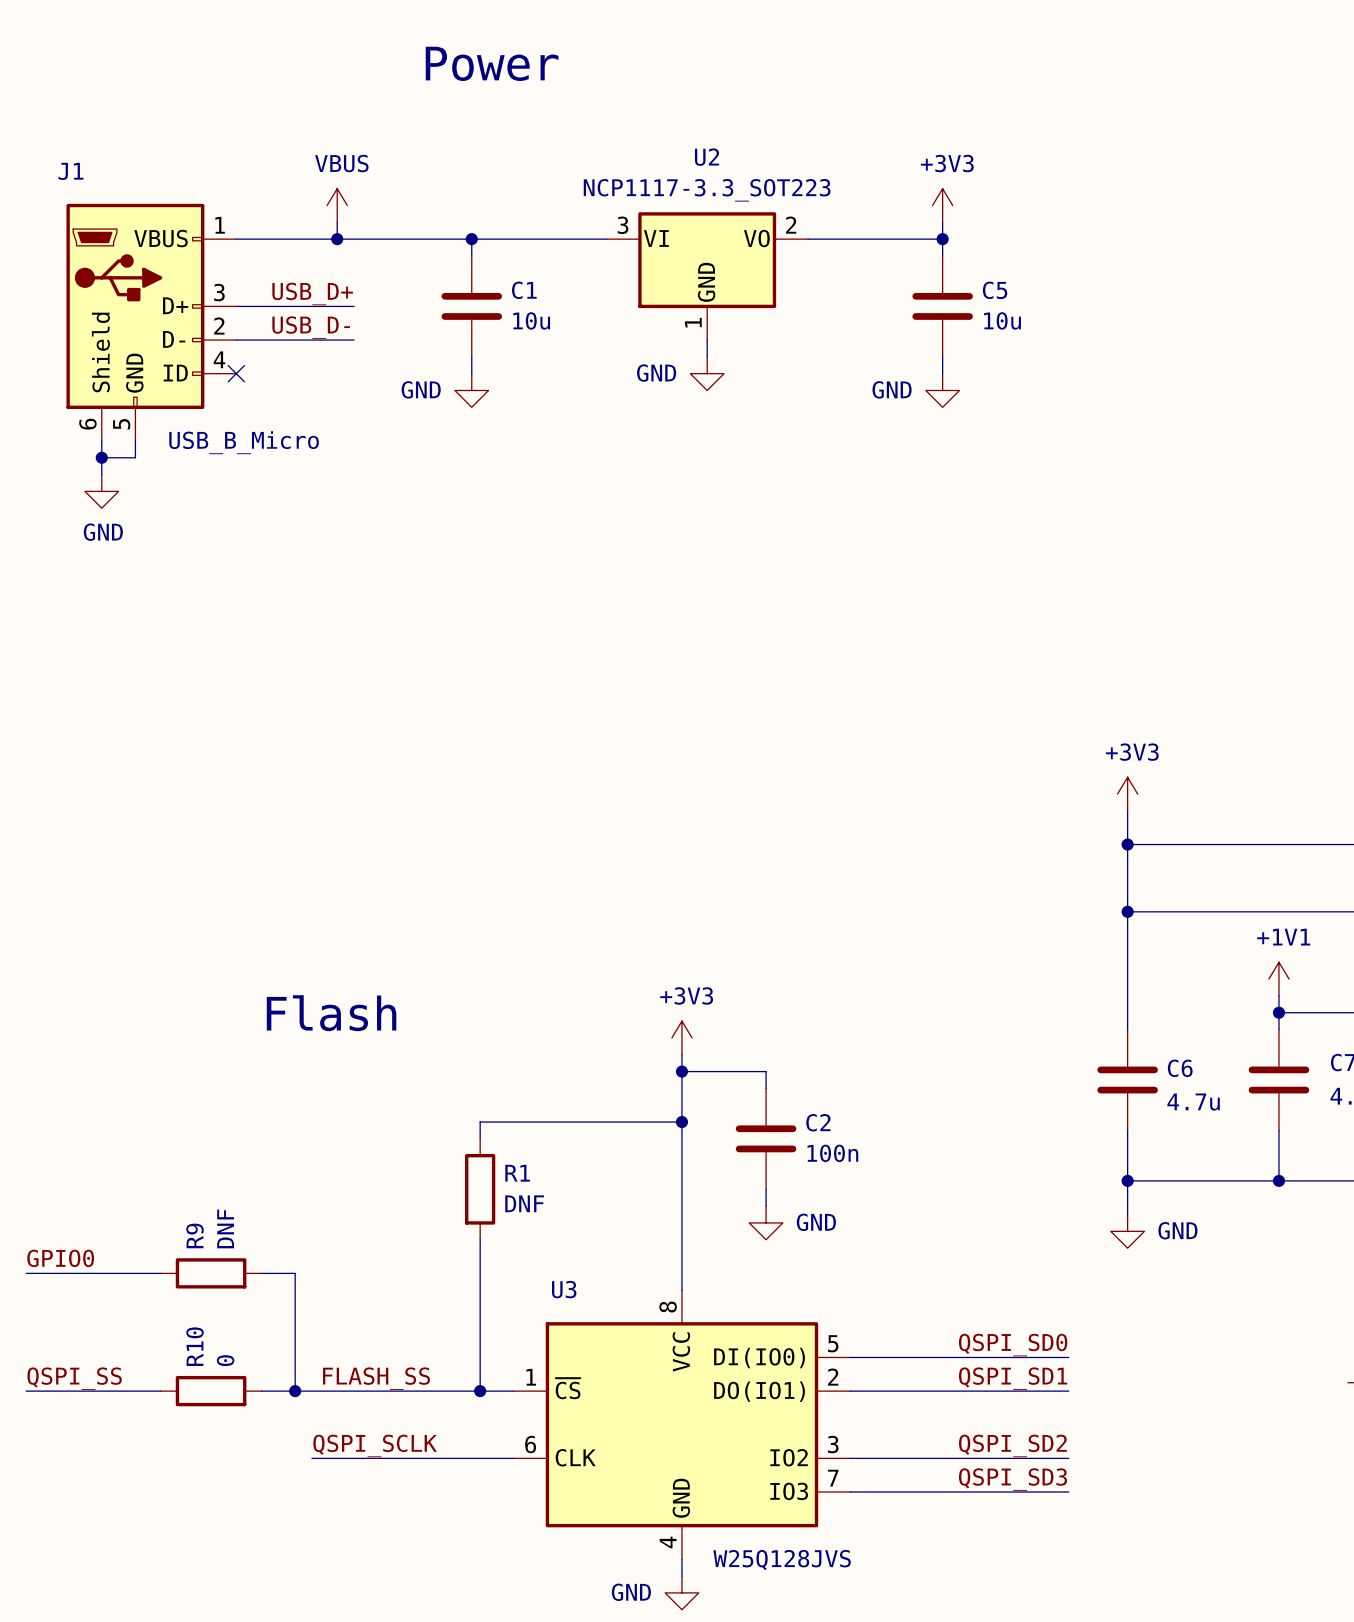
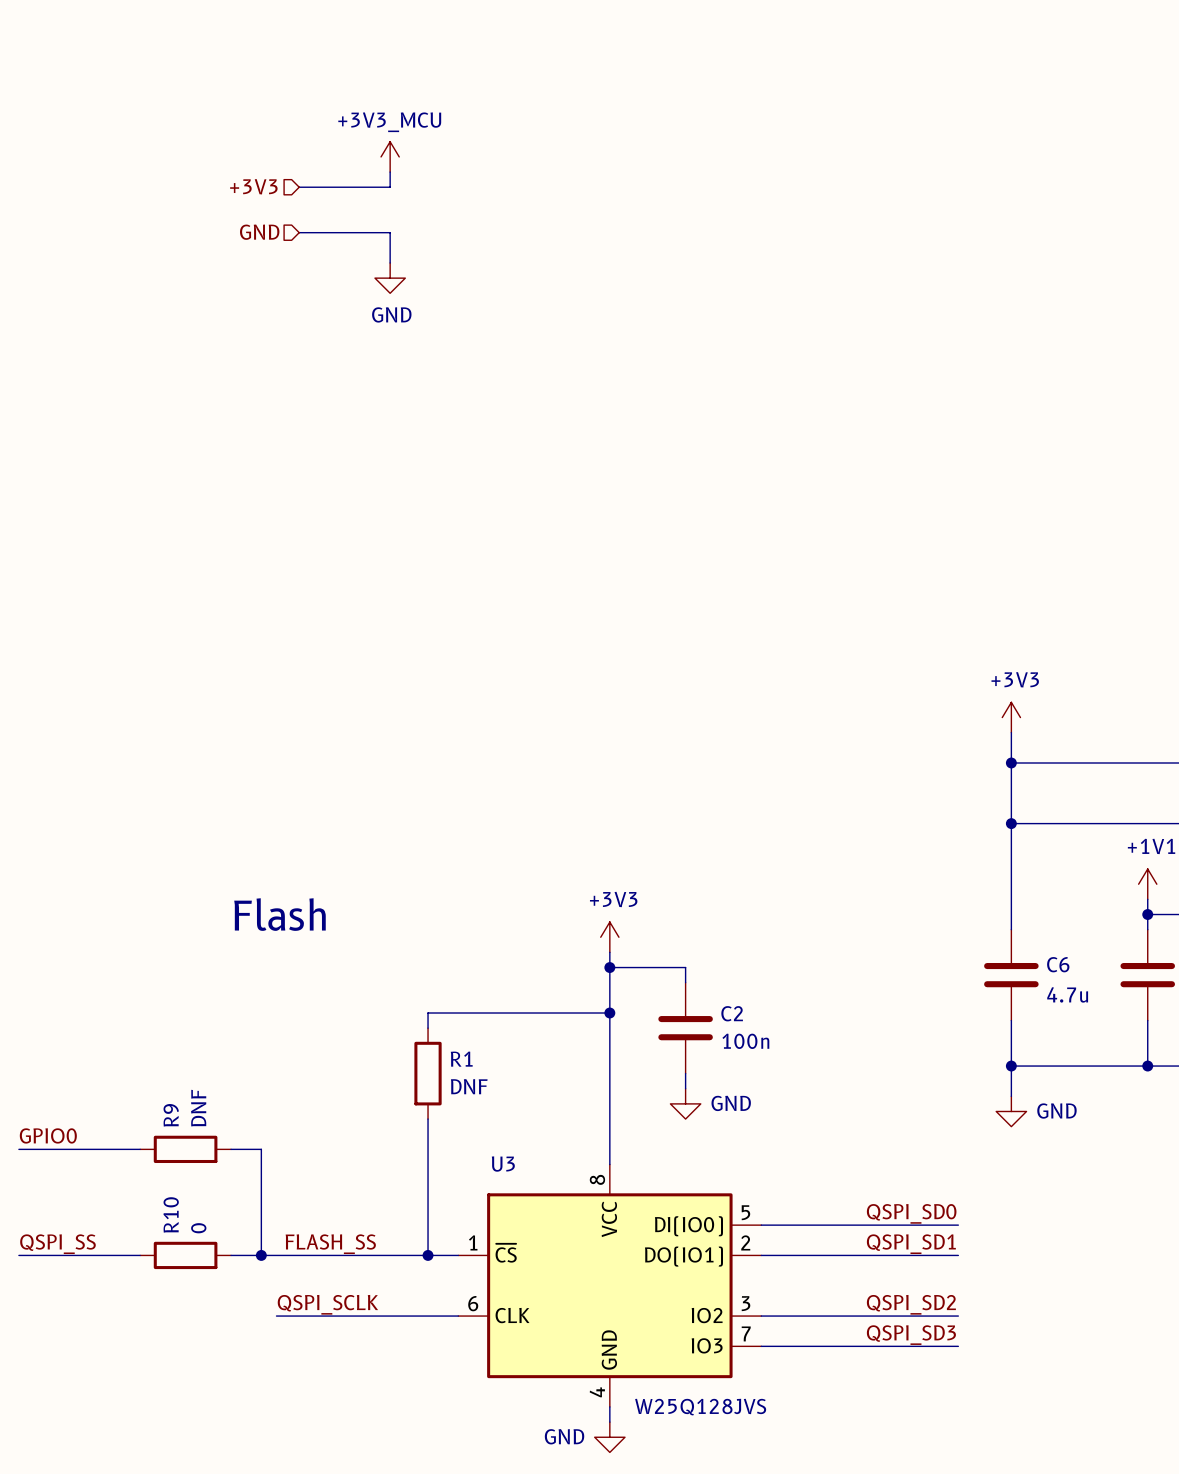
text: Power (492, 63) -> none
power symbol: none -> +3V3_MCU (390, 156)
wire: none -> (390, 172) (390, 187) (299, 187)
hierarchical label: none -> +3V3 (253, 186)
power symbol: VBUS (337, 205) -> none
power symbol: +3V3 (942, 205) -> none
wire: (337, 222) (337, 239) -> none
wire: (942, 222) (942, 255) -> none
wire: (236, 239) (606, 239) -> none
junction: (337, 239) -> none
wire: (471, 239) (471, 255) -> none
junction: (471, 239) -> none
wire: (808, 239) (942, 239) -> none
junction: (942, 239) -> none
hierarchical label: none -> GND (259, 232)
wire: none -> (299, 232) (390, 232) (390, 262)
U2: NCP1117-3.3_SOT223 (707, 276) -> none
label: USB_D+ (312, 293) -> none
wire: (236, 306) (354, 306) -> none
C1: 10u (471, 306) -> none
C5: 10u (942, 306) -> none
J1: USB_B_Micro (151, 322) -> none
label: USB_D- (311, 327) -> none
wire: (236, 340) (354, 340) -> none
wire: (707, 340) (707, 356) -> none
wire: (471, 356) (471, 373) -> none
wire: (942, 356) (942, 373) -> none
no-connect mark: (236, 373) -> none
power symbol: GND (707, 373) -> none
power symbol text position: GND (421, 389) -> GND (391, 314)
power symbol position: GND (471, 390) -> GND (390, 278)
power symbol: GND (942, 390) -> none
wire: (101, 440) (101, 474) -> none
wire: (135, 440) (135, 457) (101, 457) -> none
junction: (101, 457) -> none
power symbol: GND (101, 491) -> none

